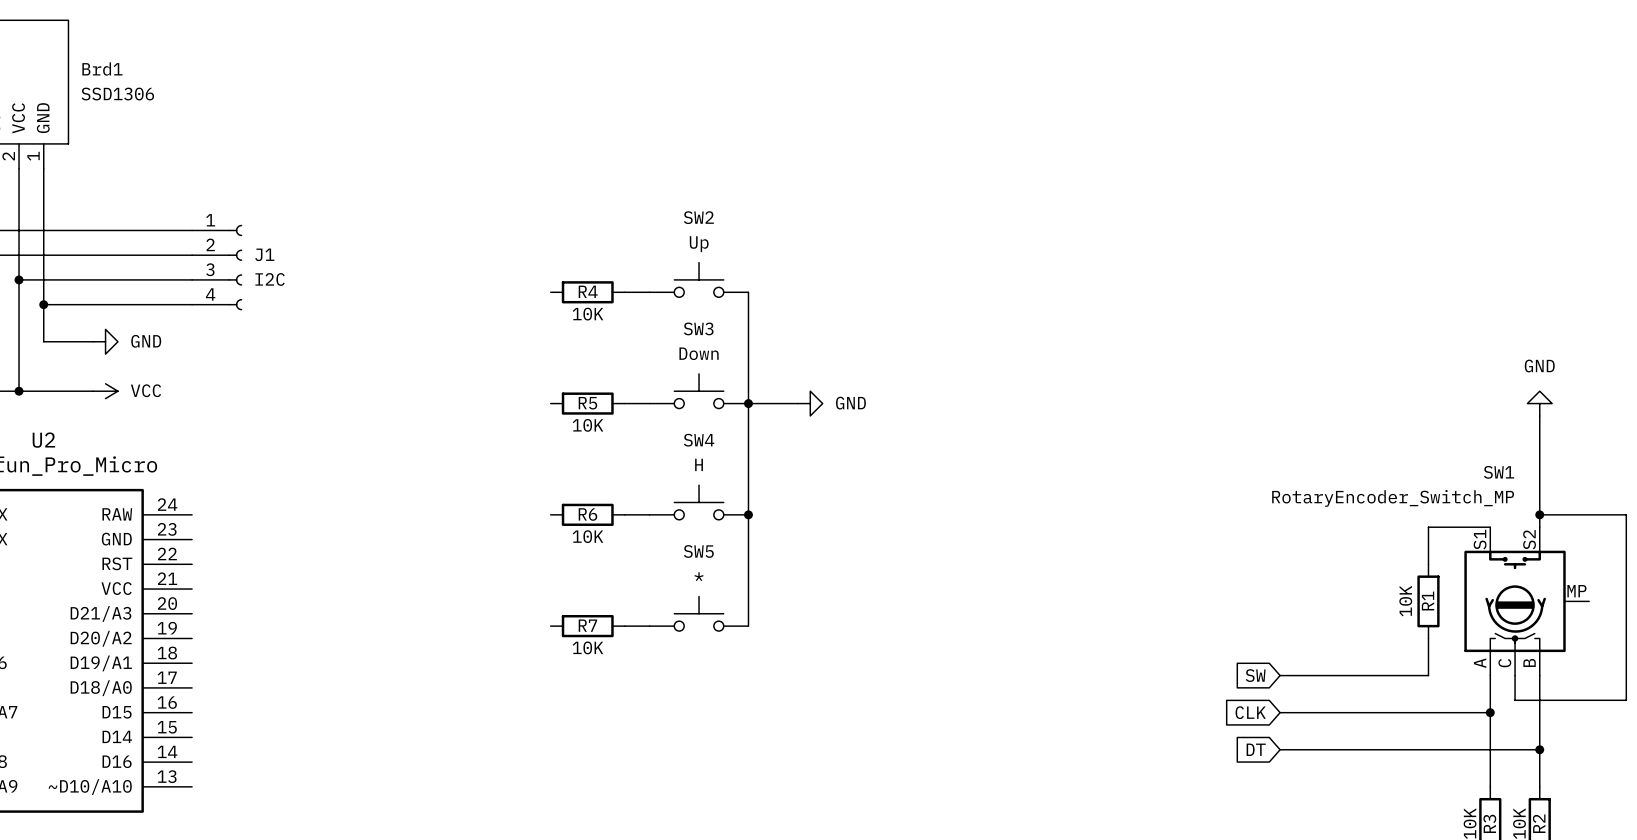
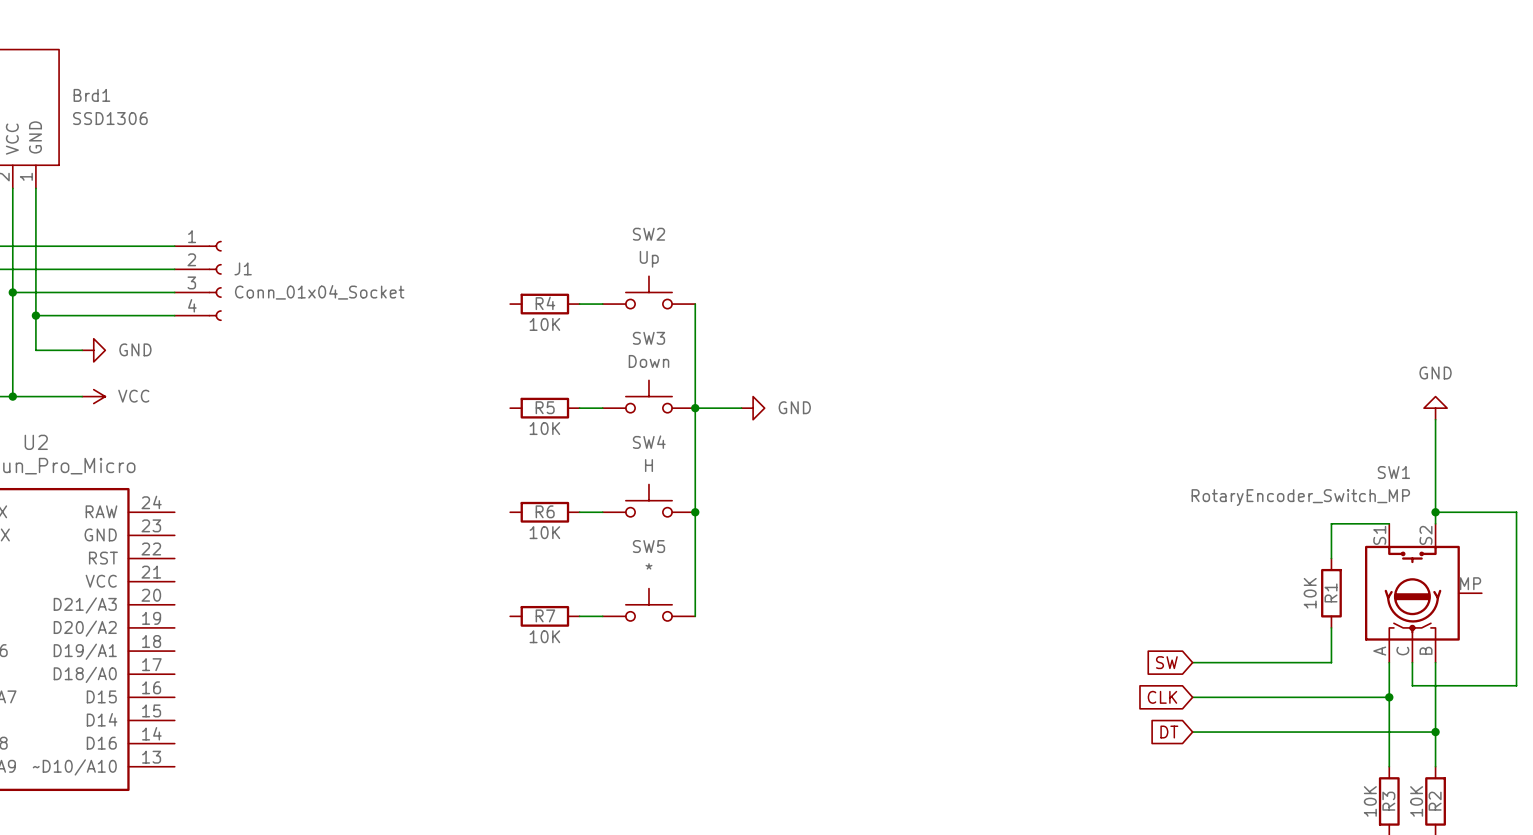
J1 value: I2C (270, 279) -> Conn_01x04_Socket (319, 292)

